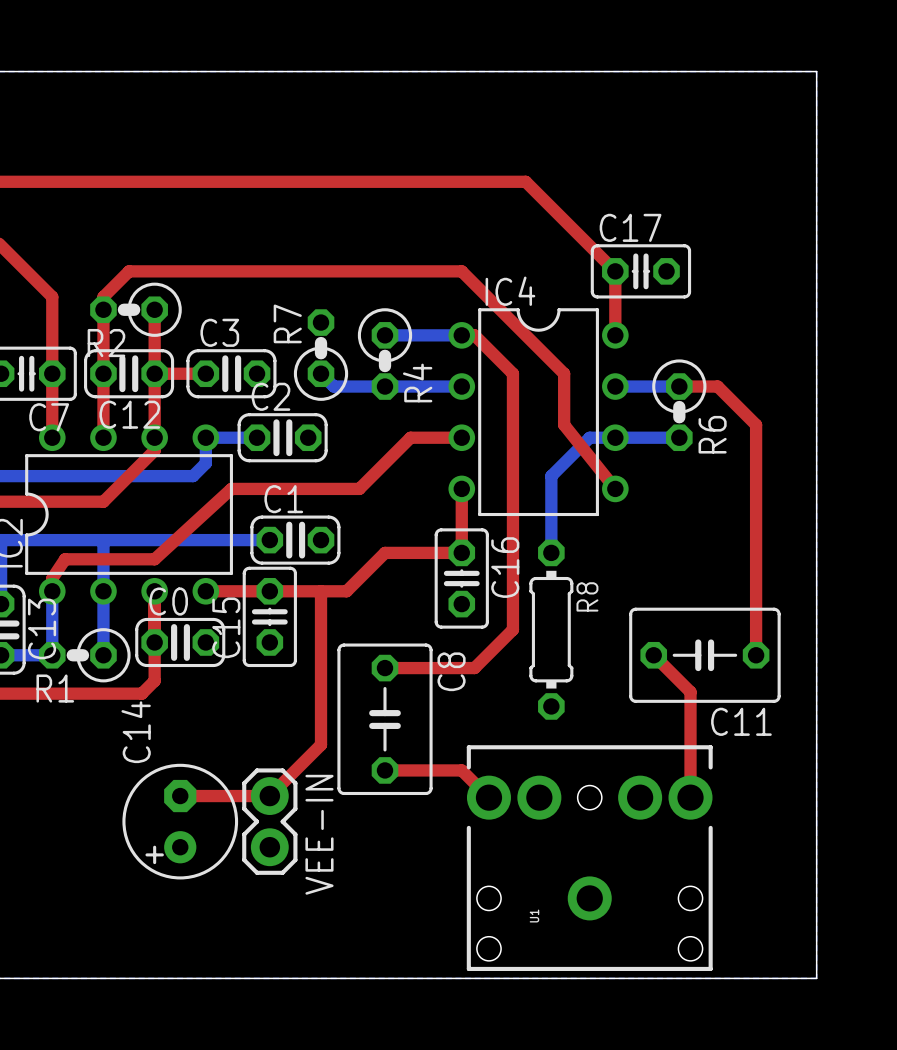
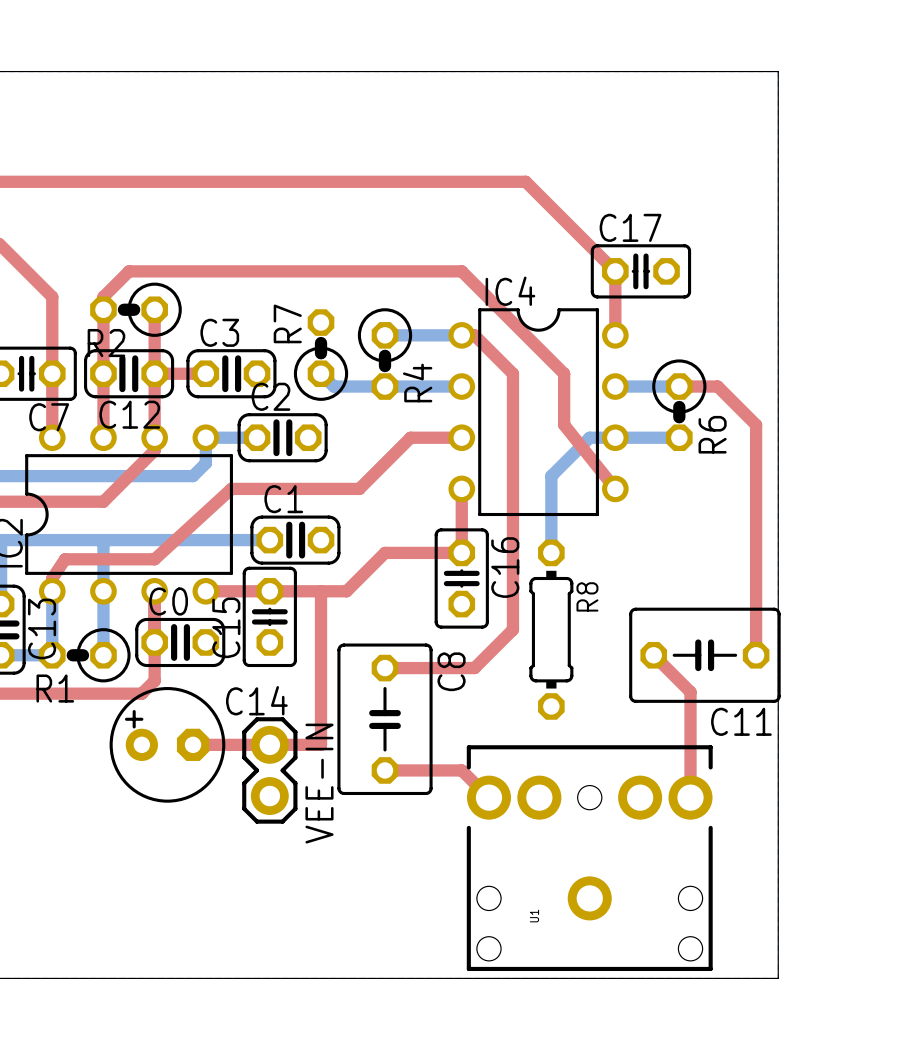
board edge: (778, 71) (816, 71) (816, 978) (778, 978) -> (778, 71) (778, 978)
top track: (321, 744) (269, 796) (180, 796) -> (321, 744) (193, 744)
C14 rotation: 0° (180, 821) -> 90° clockwise (167, 744)
C14 position: (180, 821) -> (167, 744)
VEE-IN position: (269, 821) -> (269, 770)

